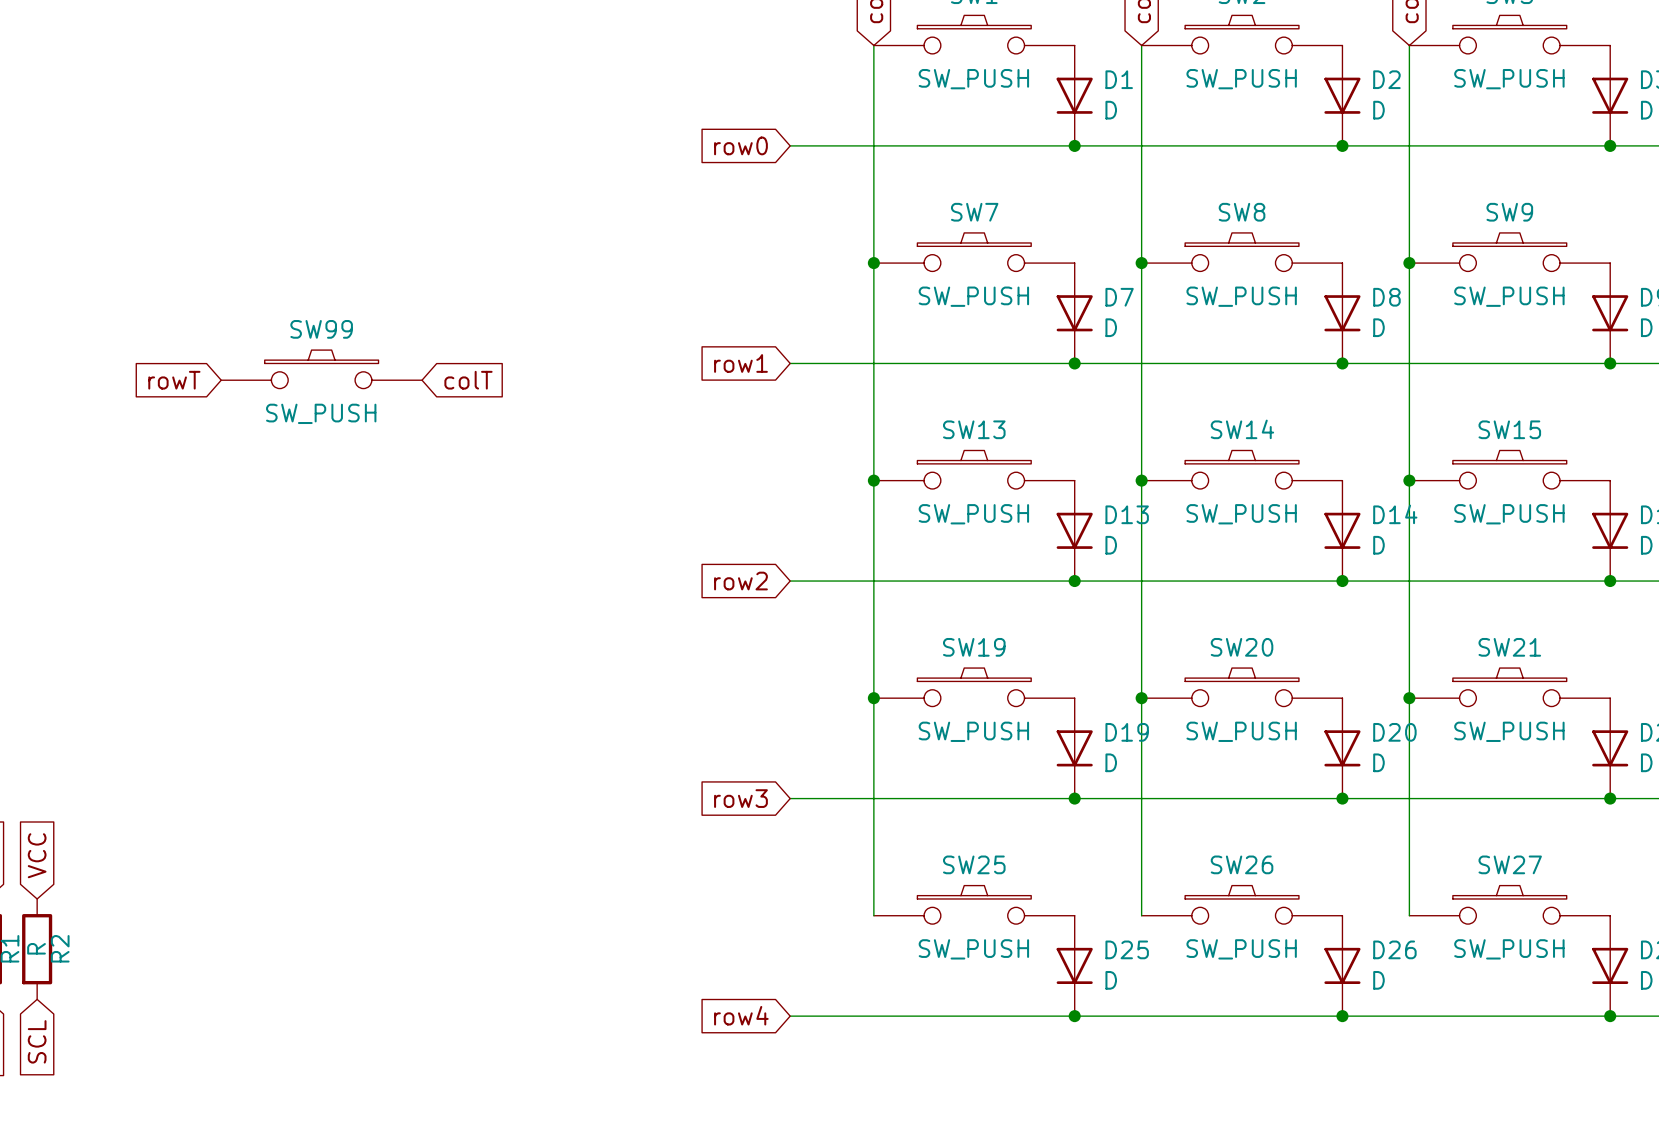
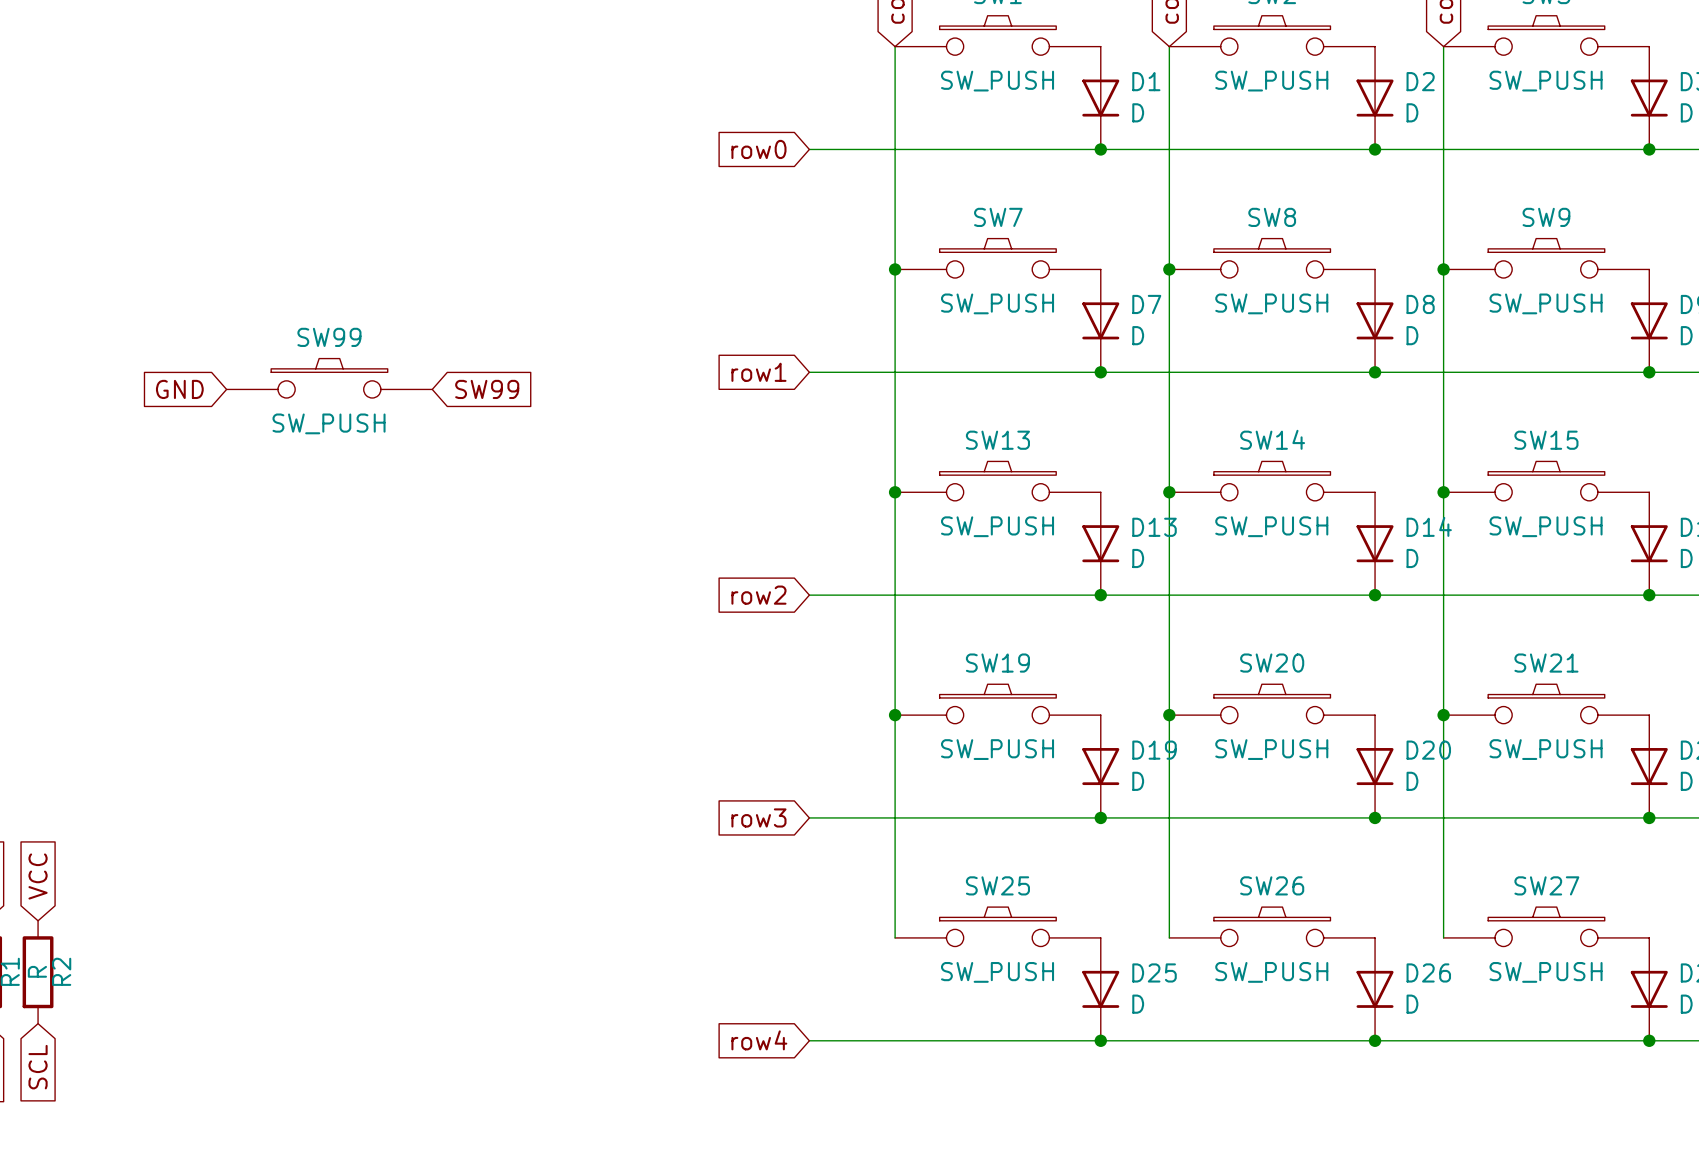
global label: rowT (174, 380) -> GND (179, 389)
global label: colT (468, 380) -> SW99 (487, 389)

